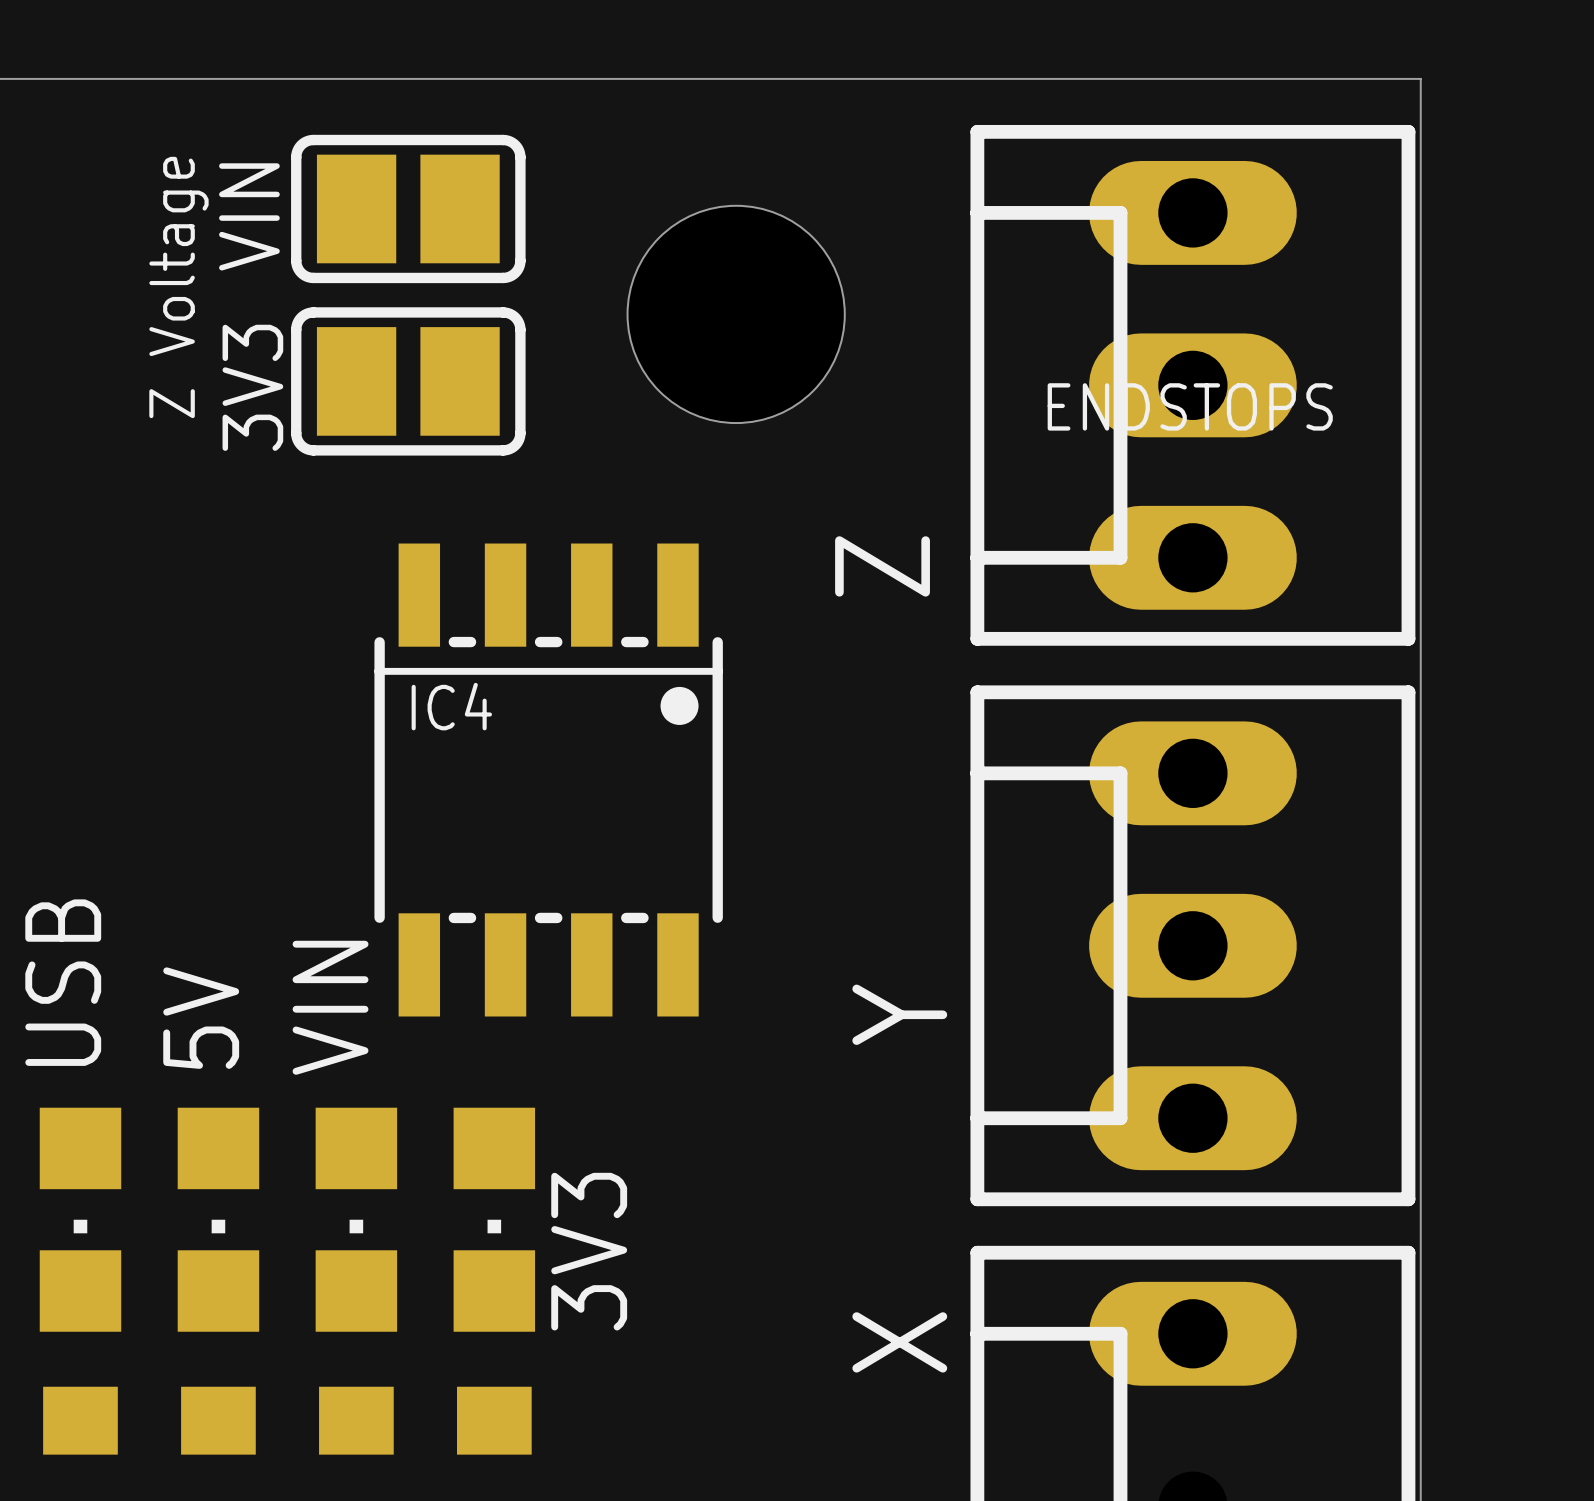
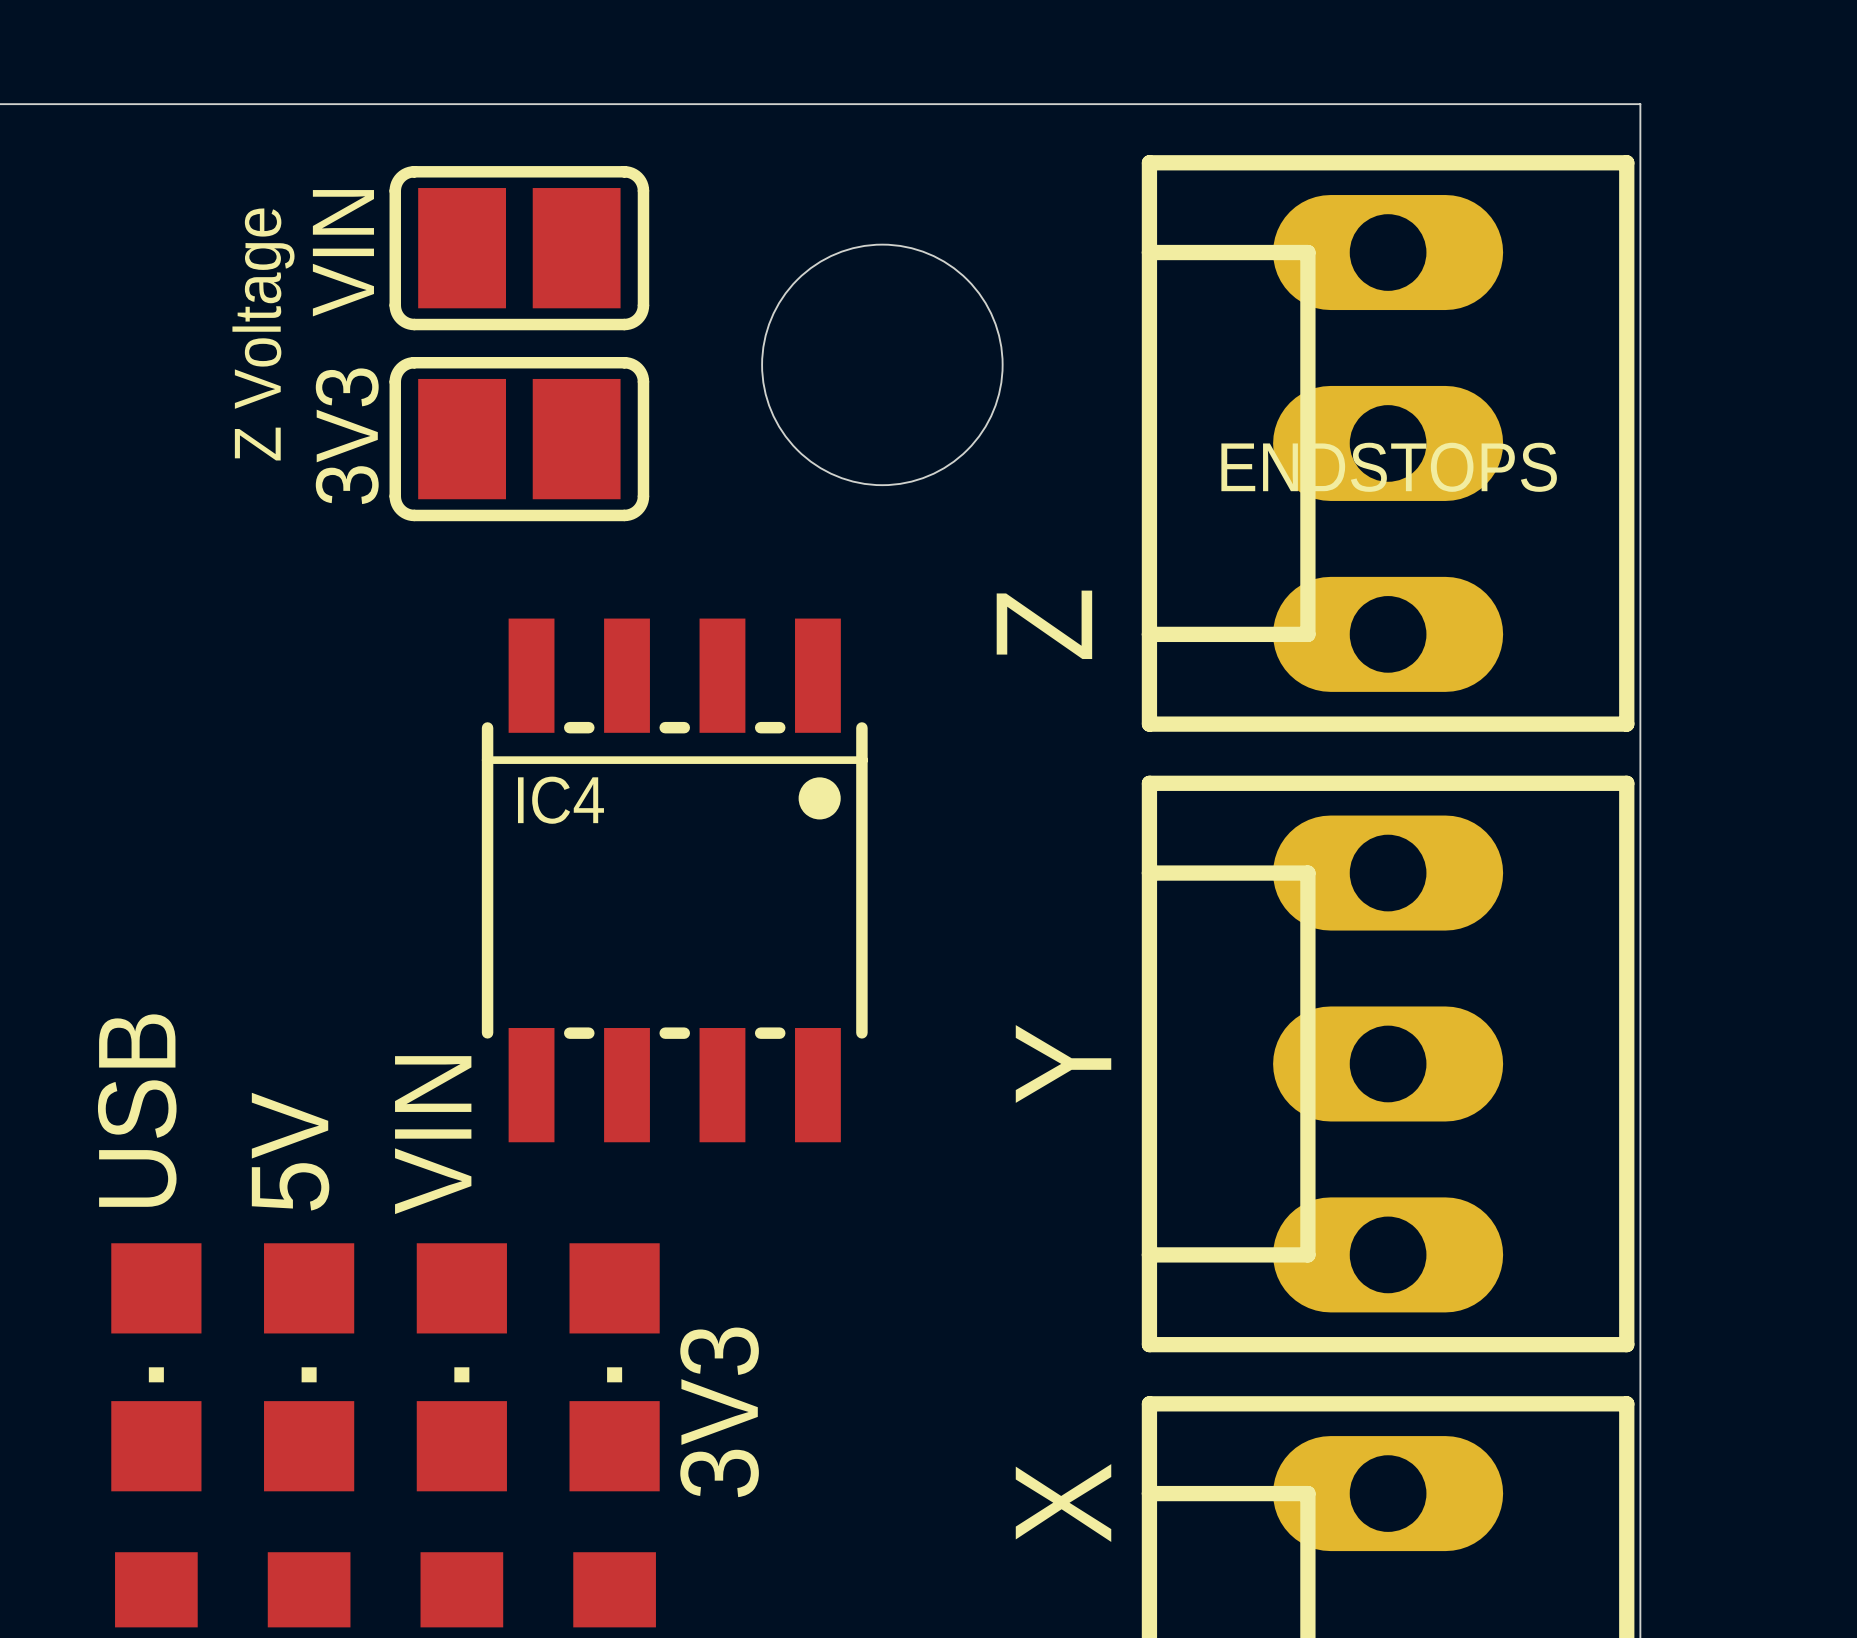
text position: Z (882, 566) -> Z (1044, 624)
text position: Y (899, 1014) -> Y (1063, 1063)

